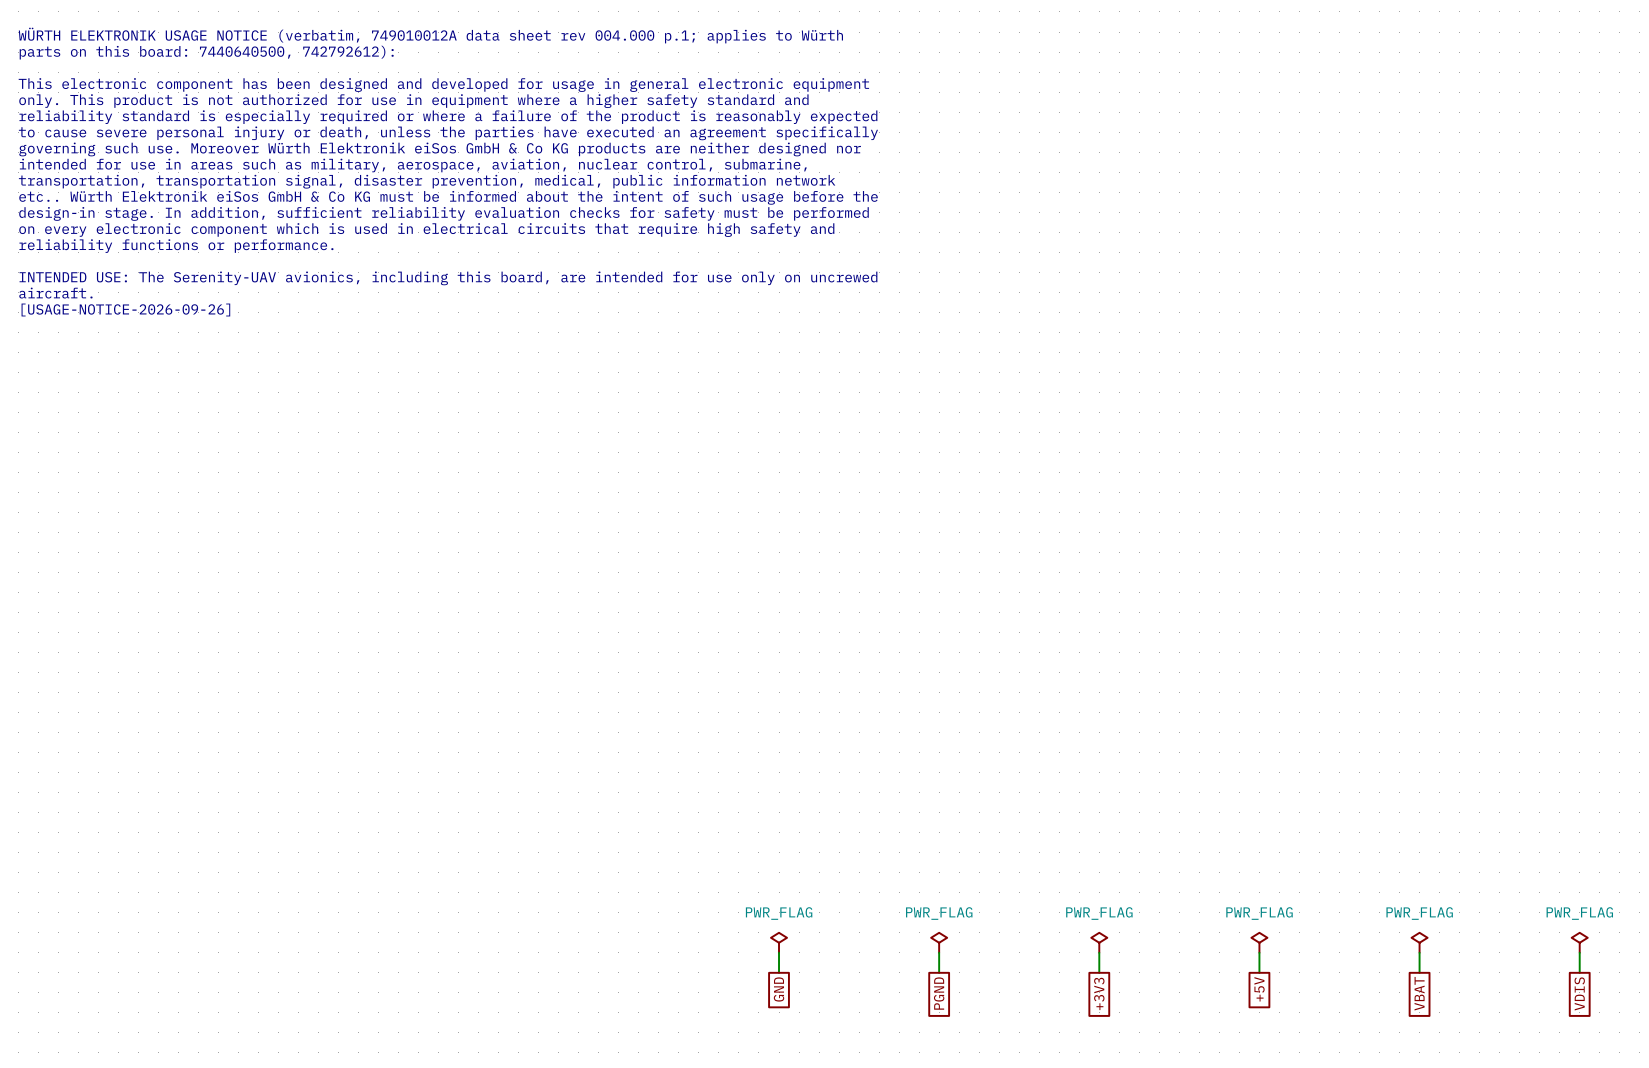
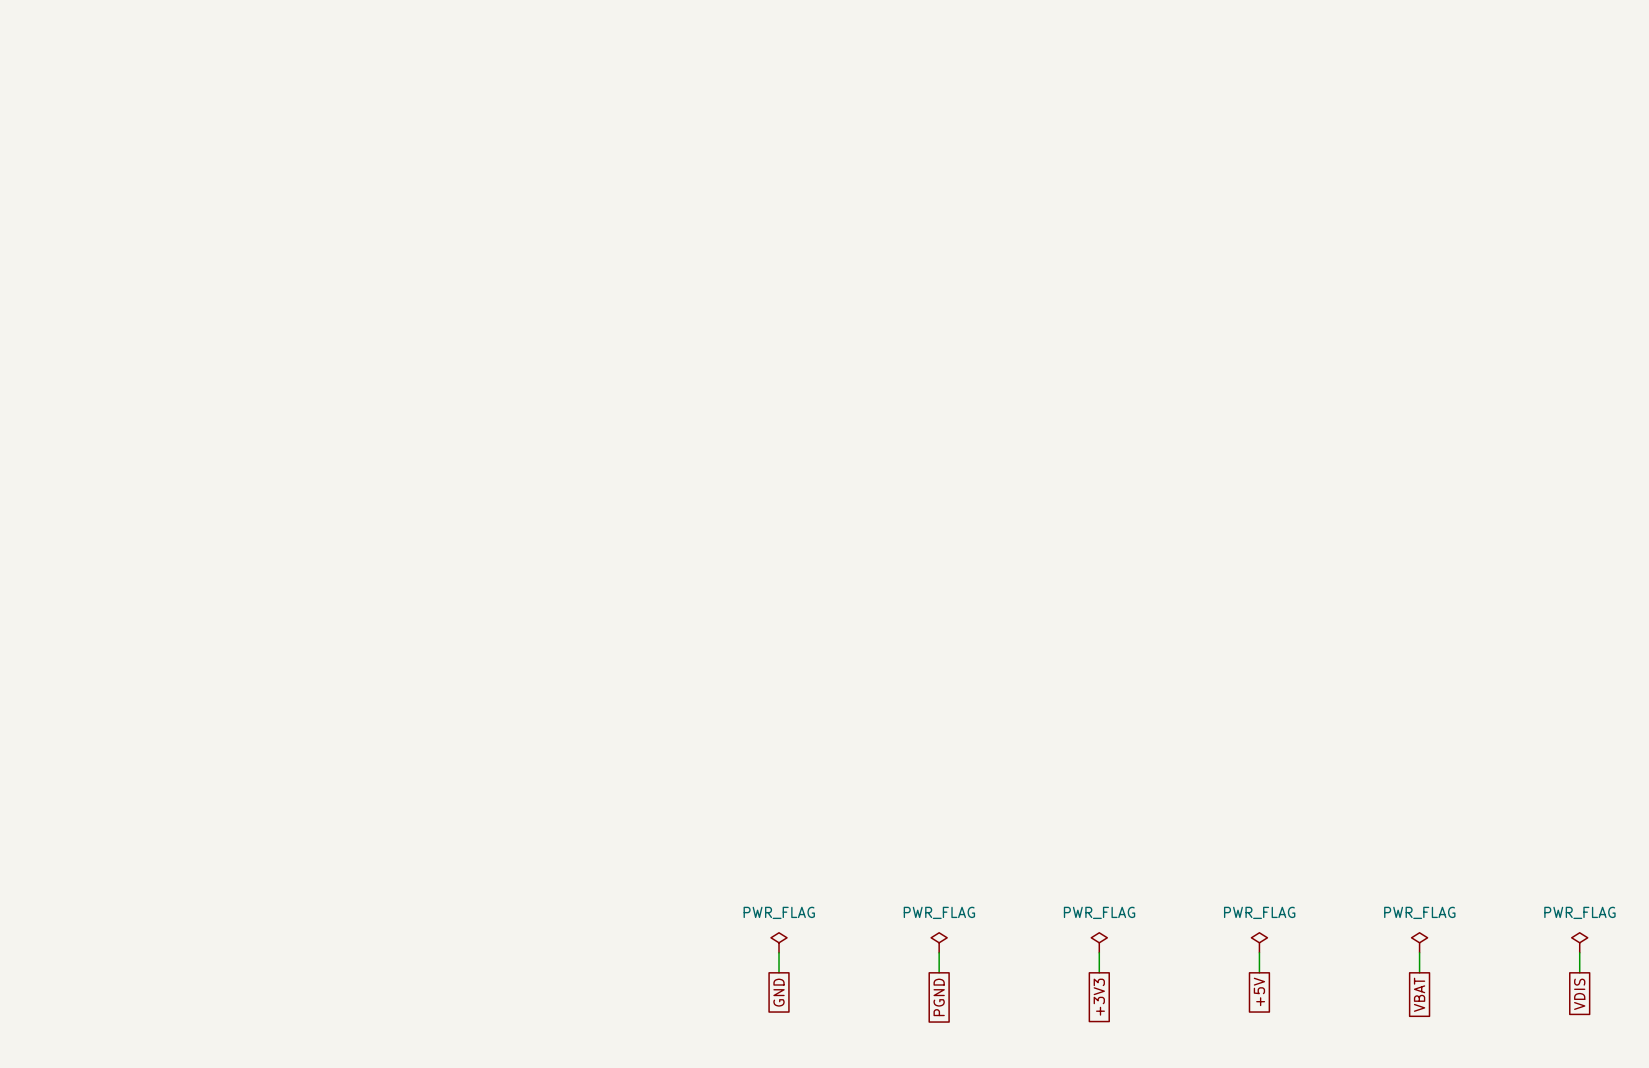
text: WÜRTH ELEKTRONIK USAGE NOTICE (verbatim, 749010012A data sheet rev 004.000 p.1; applies to Würth (430, 35) -> none
text: parts on this board: 7440640500, 742792612): (206, 52) -> none
text: This electronic component has been designed and developed for usage in general electronic equipment (443, 85) -> none
text: only. This product is not authorized for use in equipment where a higher safety standard and (413, 101) -> none
text: reliability standard is especially required or where a failure of the product is reasonably expected (448, 117) -> none
text: to cause severe personal injury or death, unless the parties have executed an agreement specifically (448, 133) -> none
text: governing such use. Moreover Würth Elektronik eiSos GmbH & Co KG products are neither designed nor (440, 149) -> none
text: intended for use in areas such as military, aerospace, aviation, nuclear control, submarine, (413, 165) -> none
text: transportation, transportation signal, disaster prevention, medical, public information network (427, 181) -> none
text: etc.. Würth Elektronik eiSos GmbH & Co KG must be informed about the intent of such usage before the (448, 197) -> none
text: design-in stage. In addition, sufficient reliability evaluation checks for safety must be performed (443, 213) -> none
text: on every electronic component which is used in electrical circuits that require high safety and (426, 230) -> none
text: reliability functions or performance. (176, 246) -> none
text: INTENDED USE: The Serenity-UAV avionics, including this board, are intended for use only on uncrewed (448, 278) -> none
text: aircraft. (55, 293) -> none
text: [USAGE-NOTICE-2026-09-26] (125, 310) -> none

